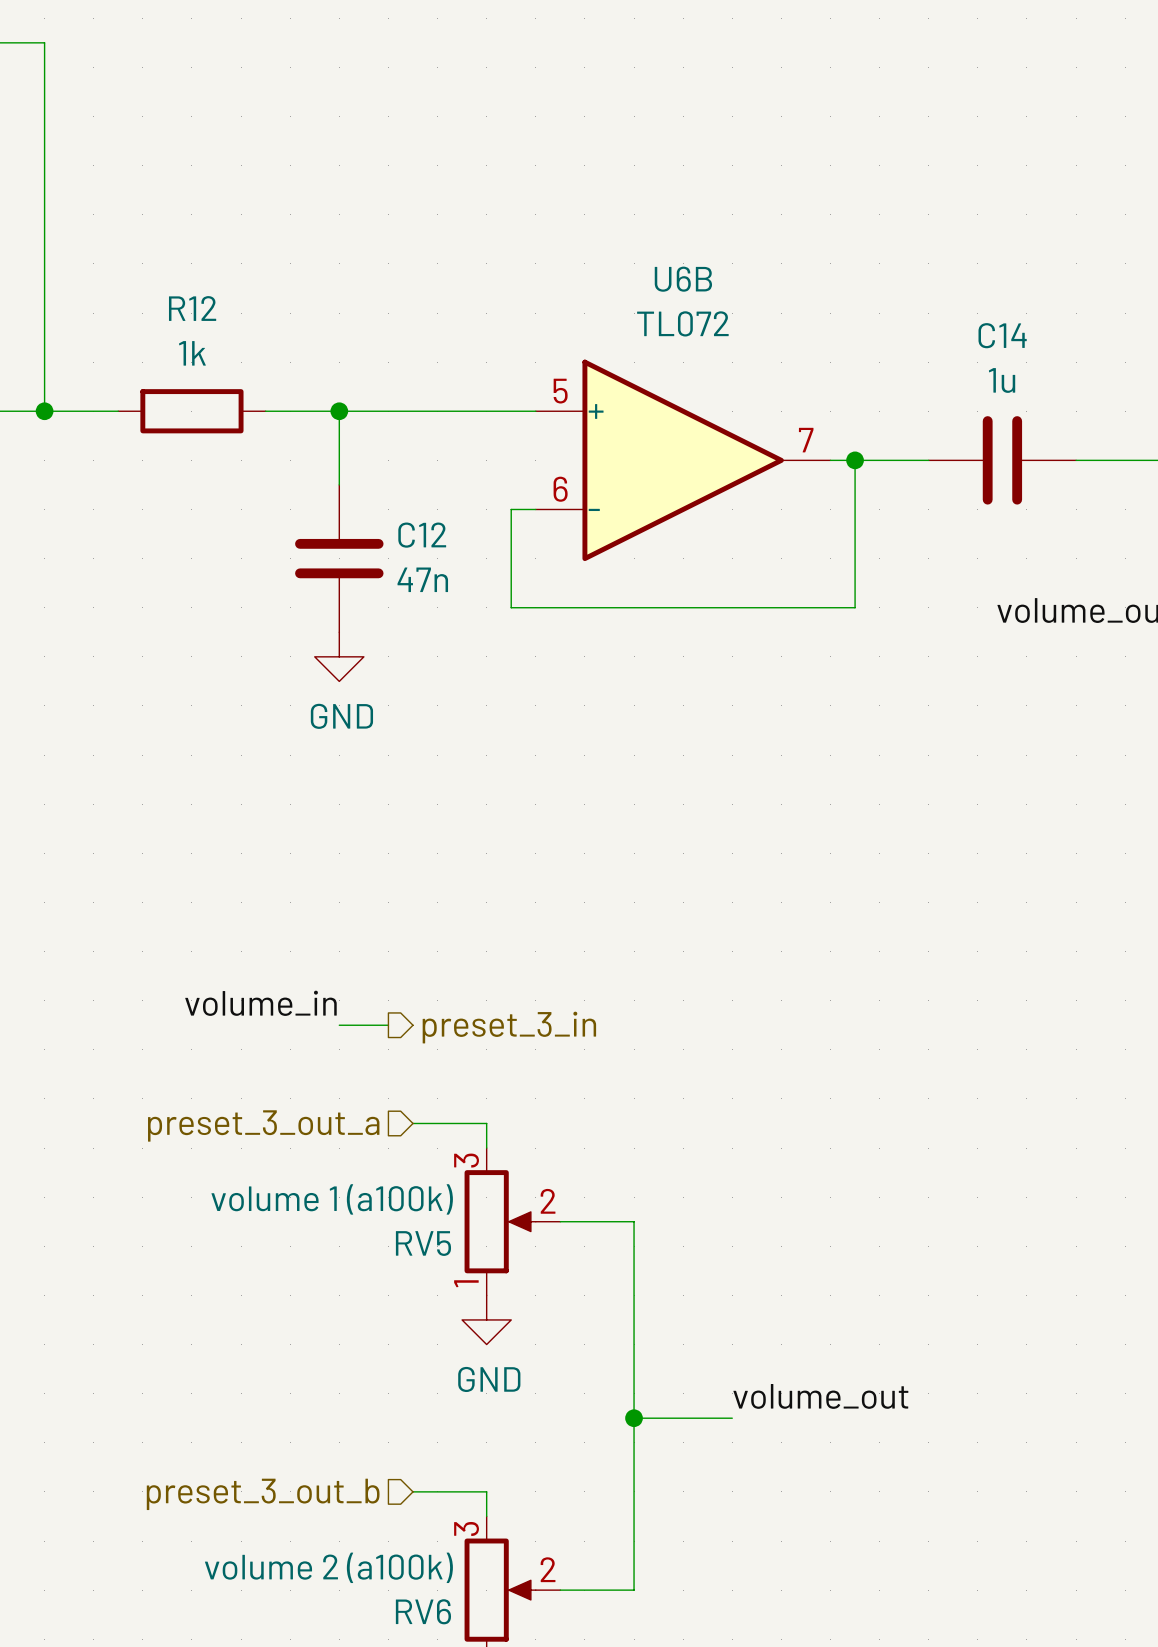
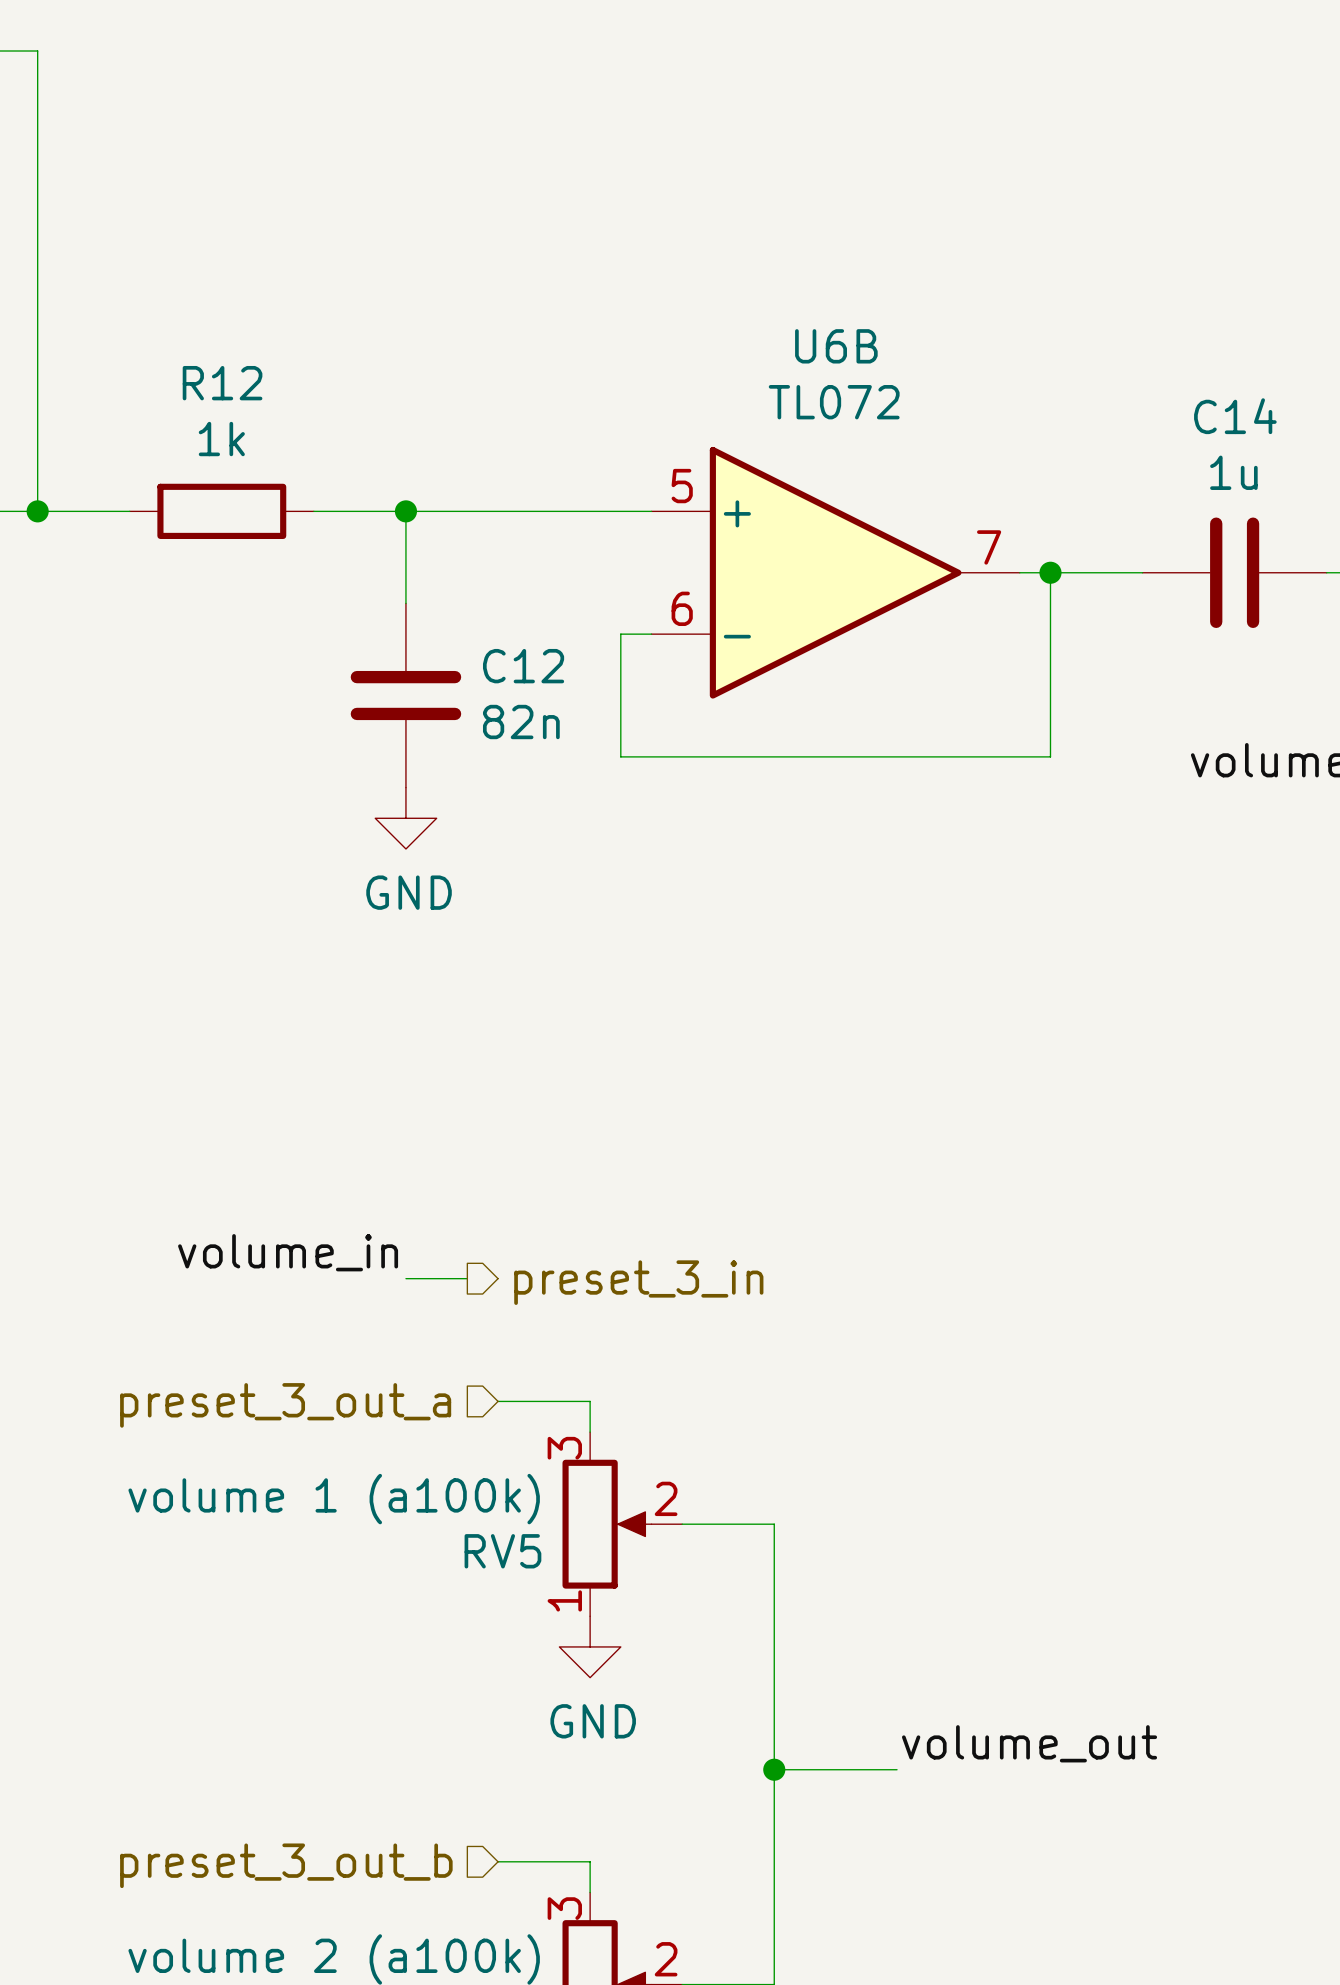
C12 value: 47n (422, 579) -> 82n (521, 721)

